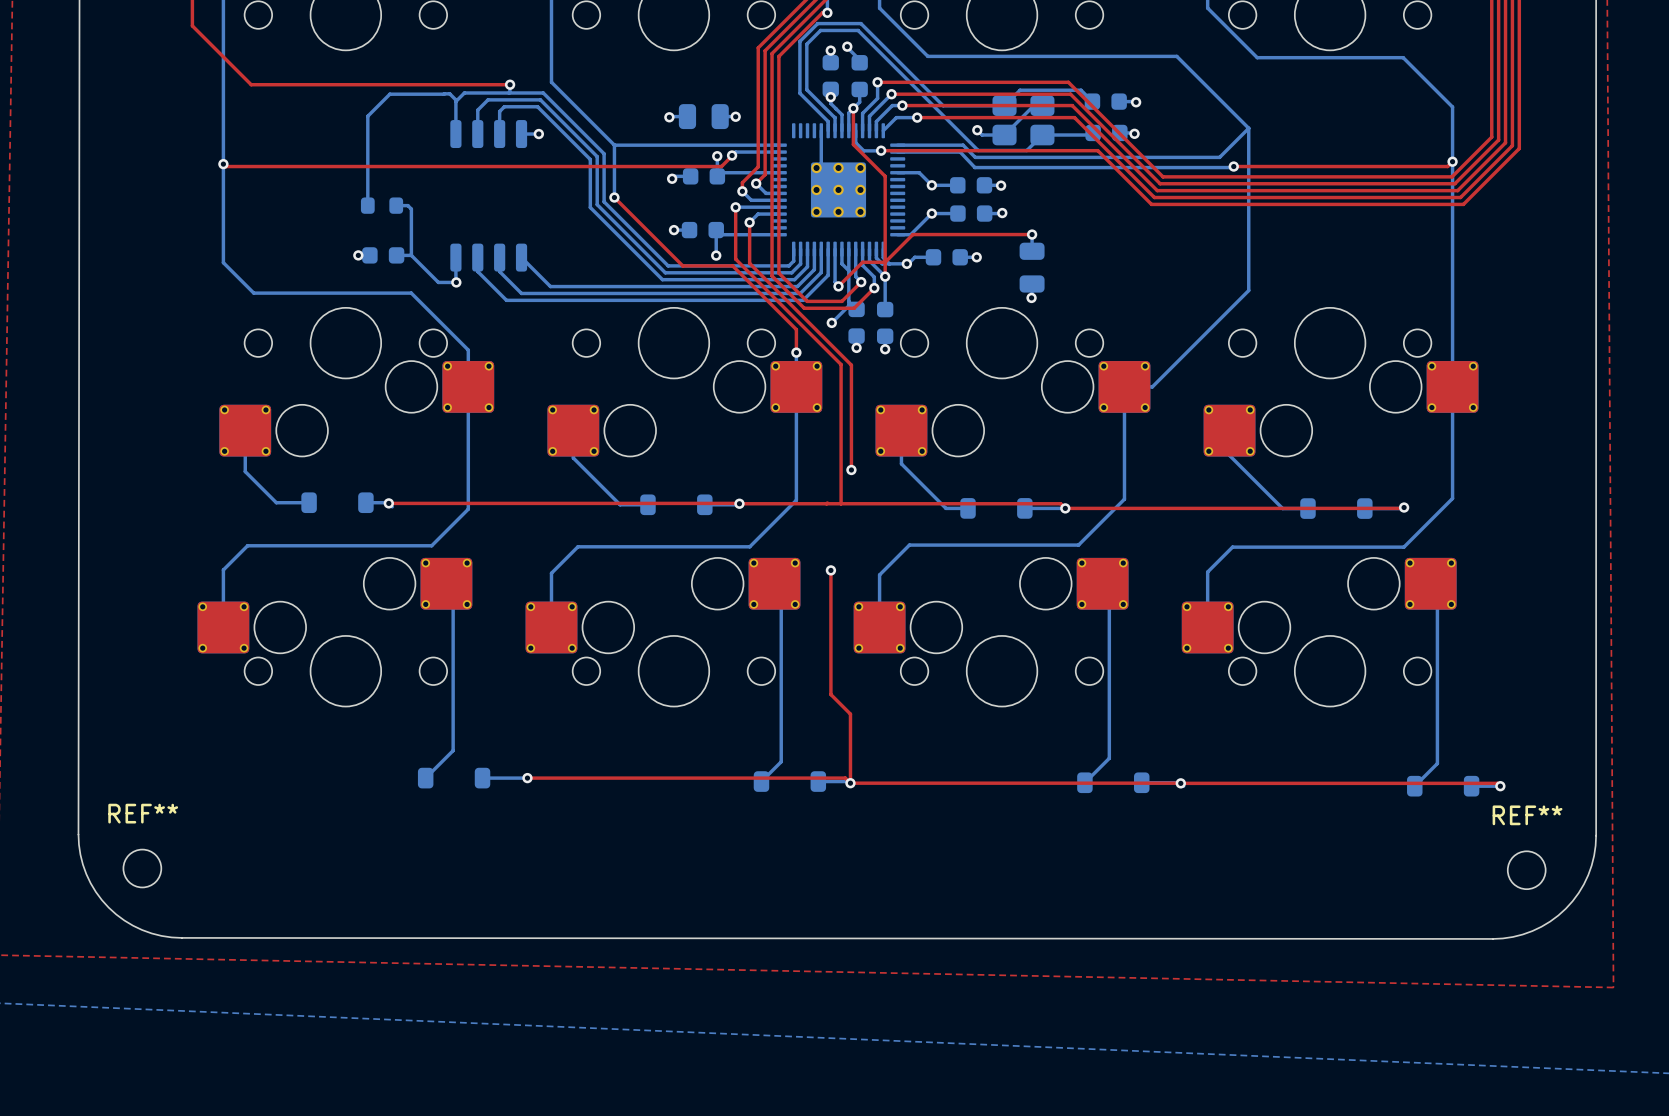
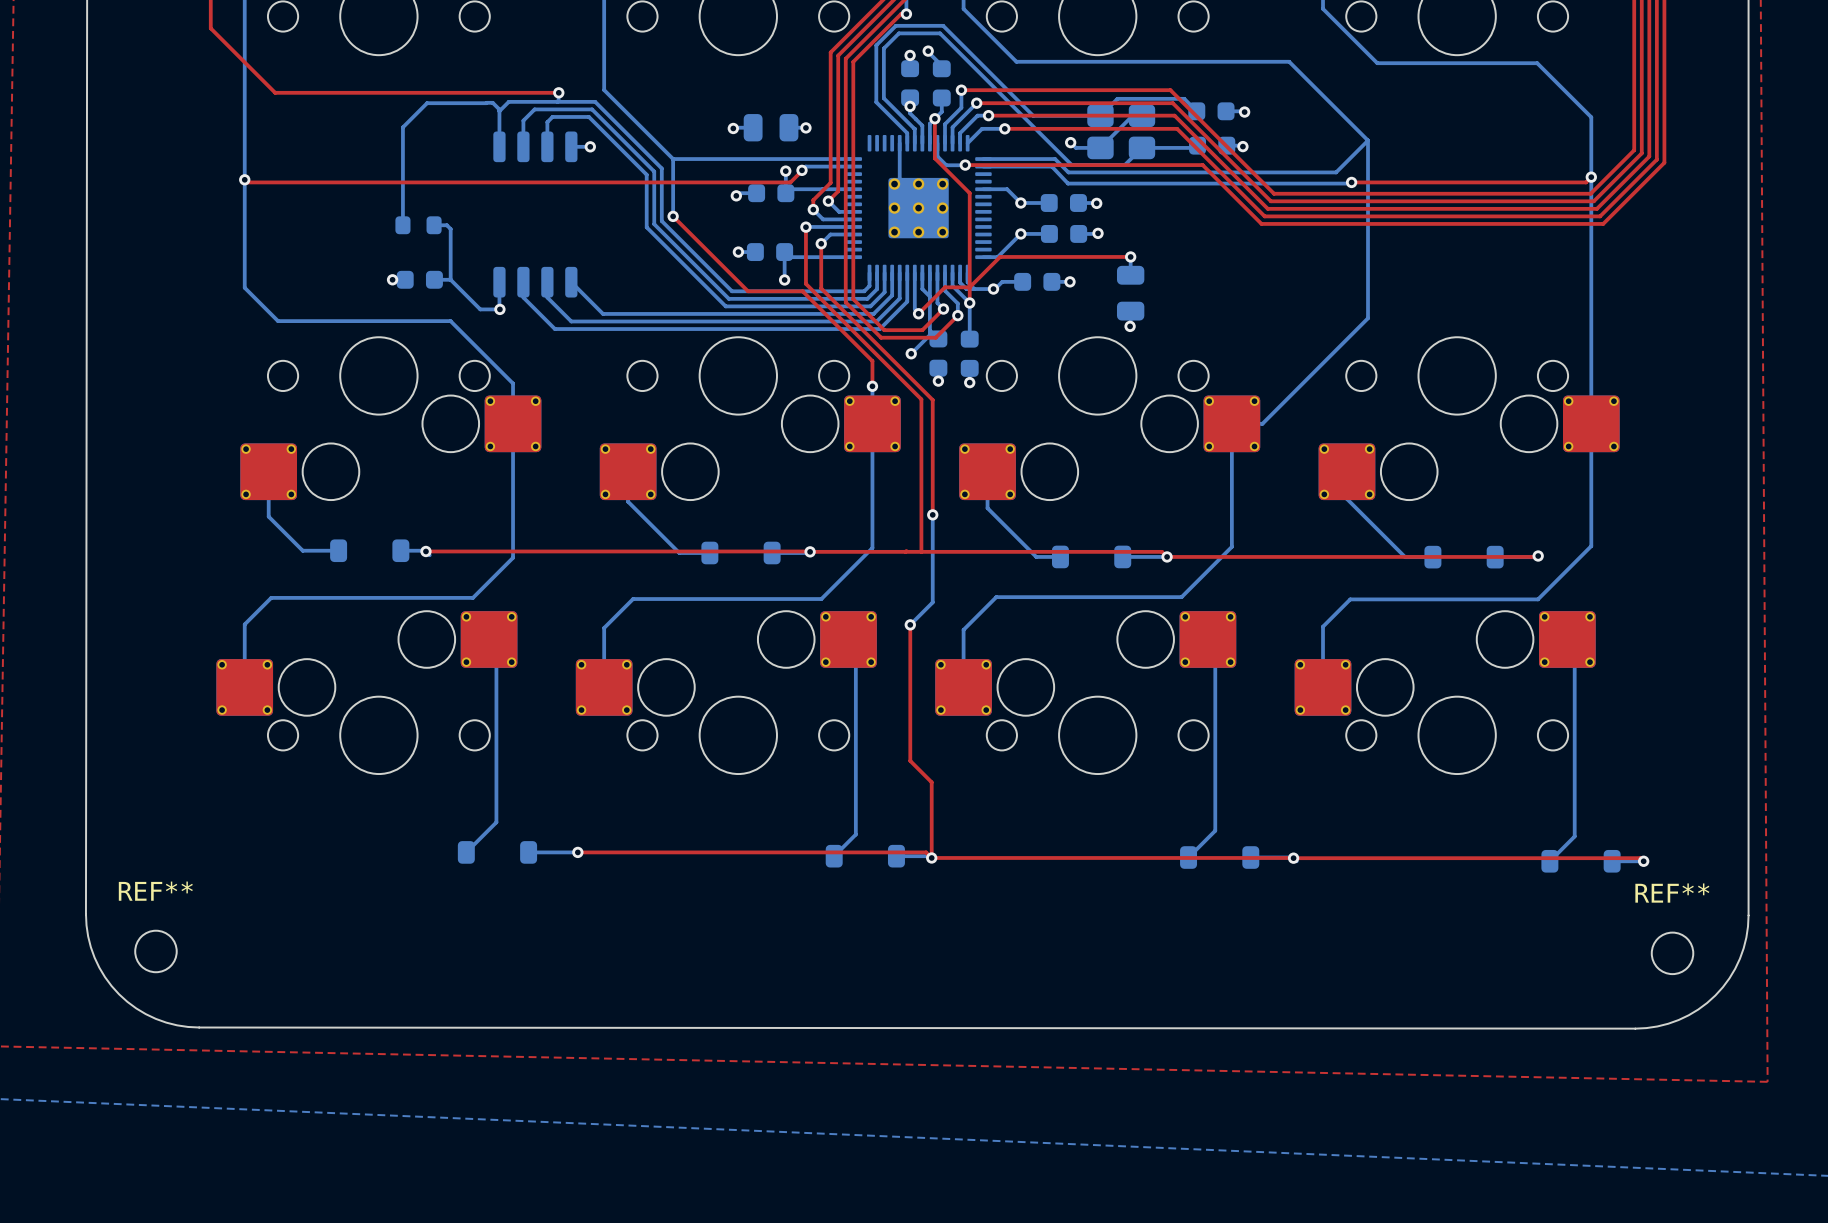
bottom track: none -> (932, 514) (932, 602) (910, 624)

